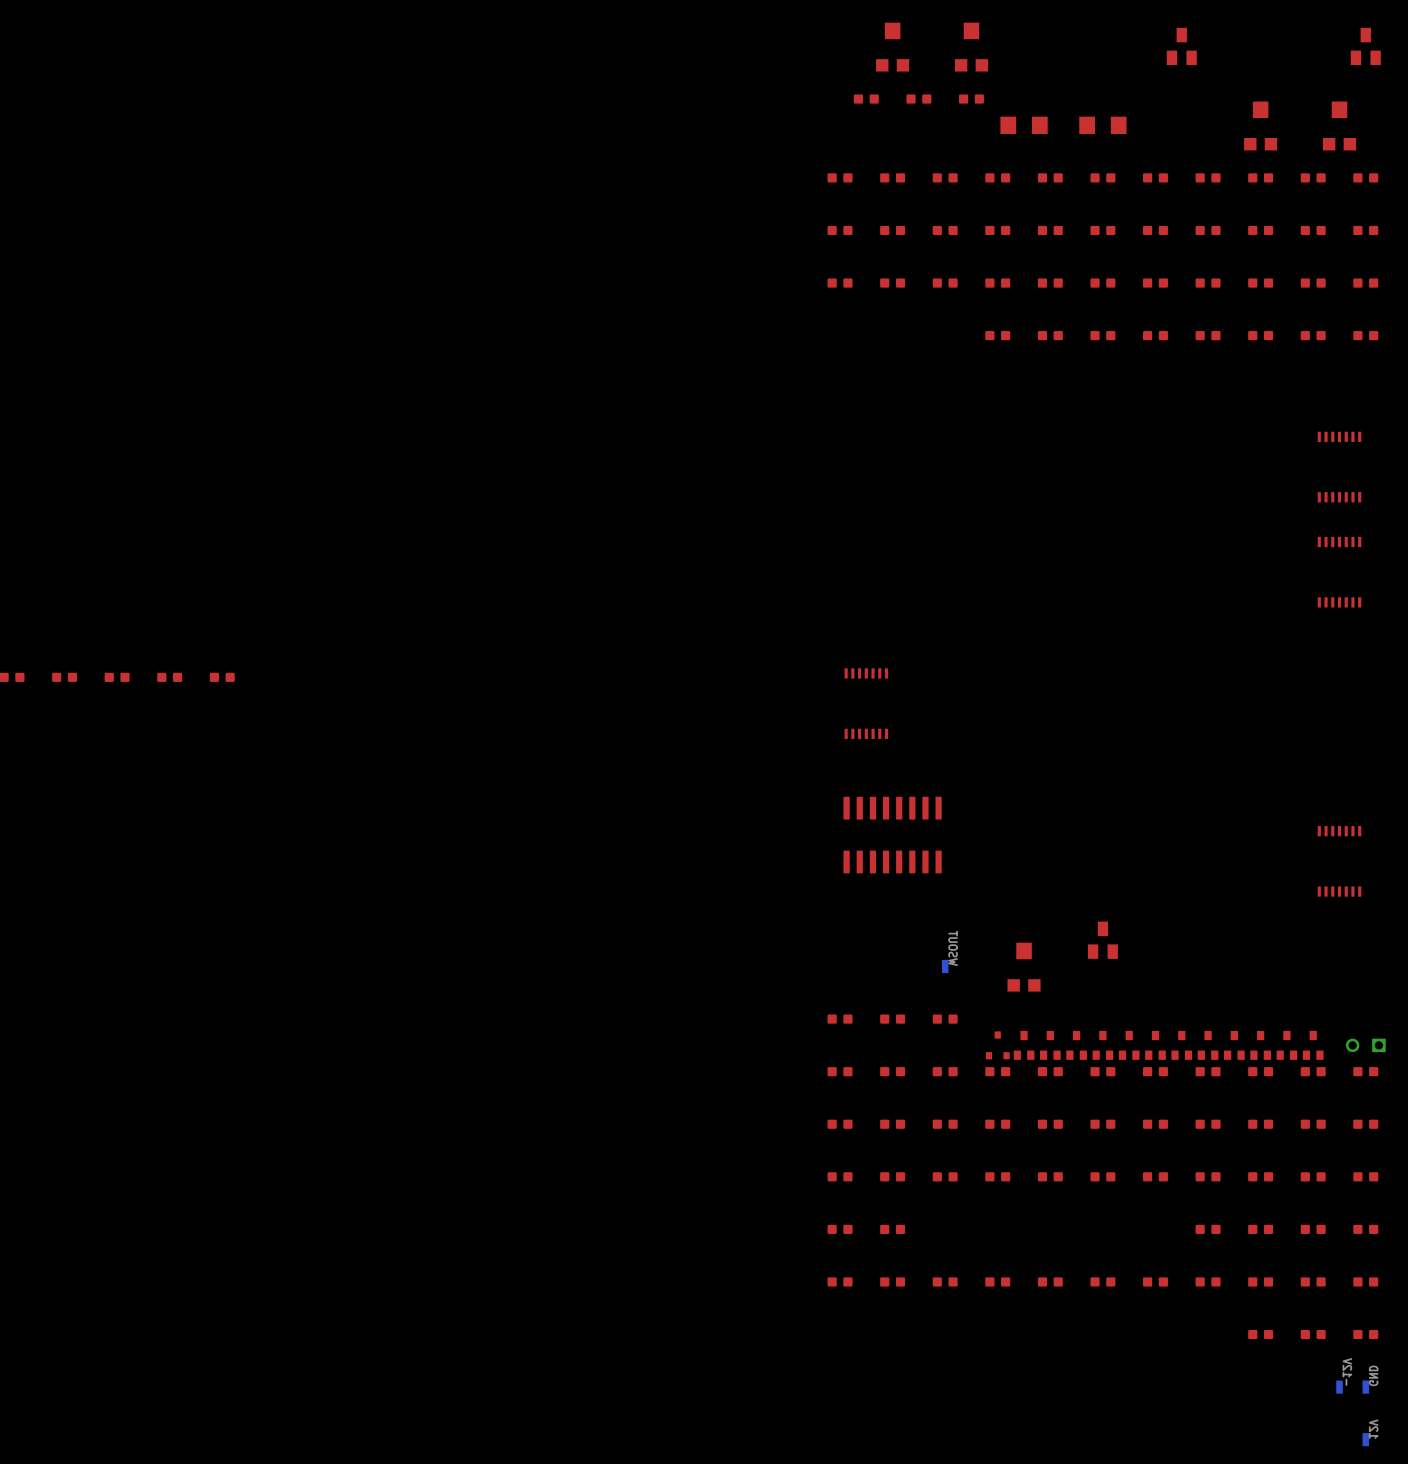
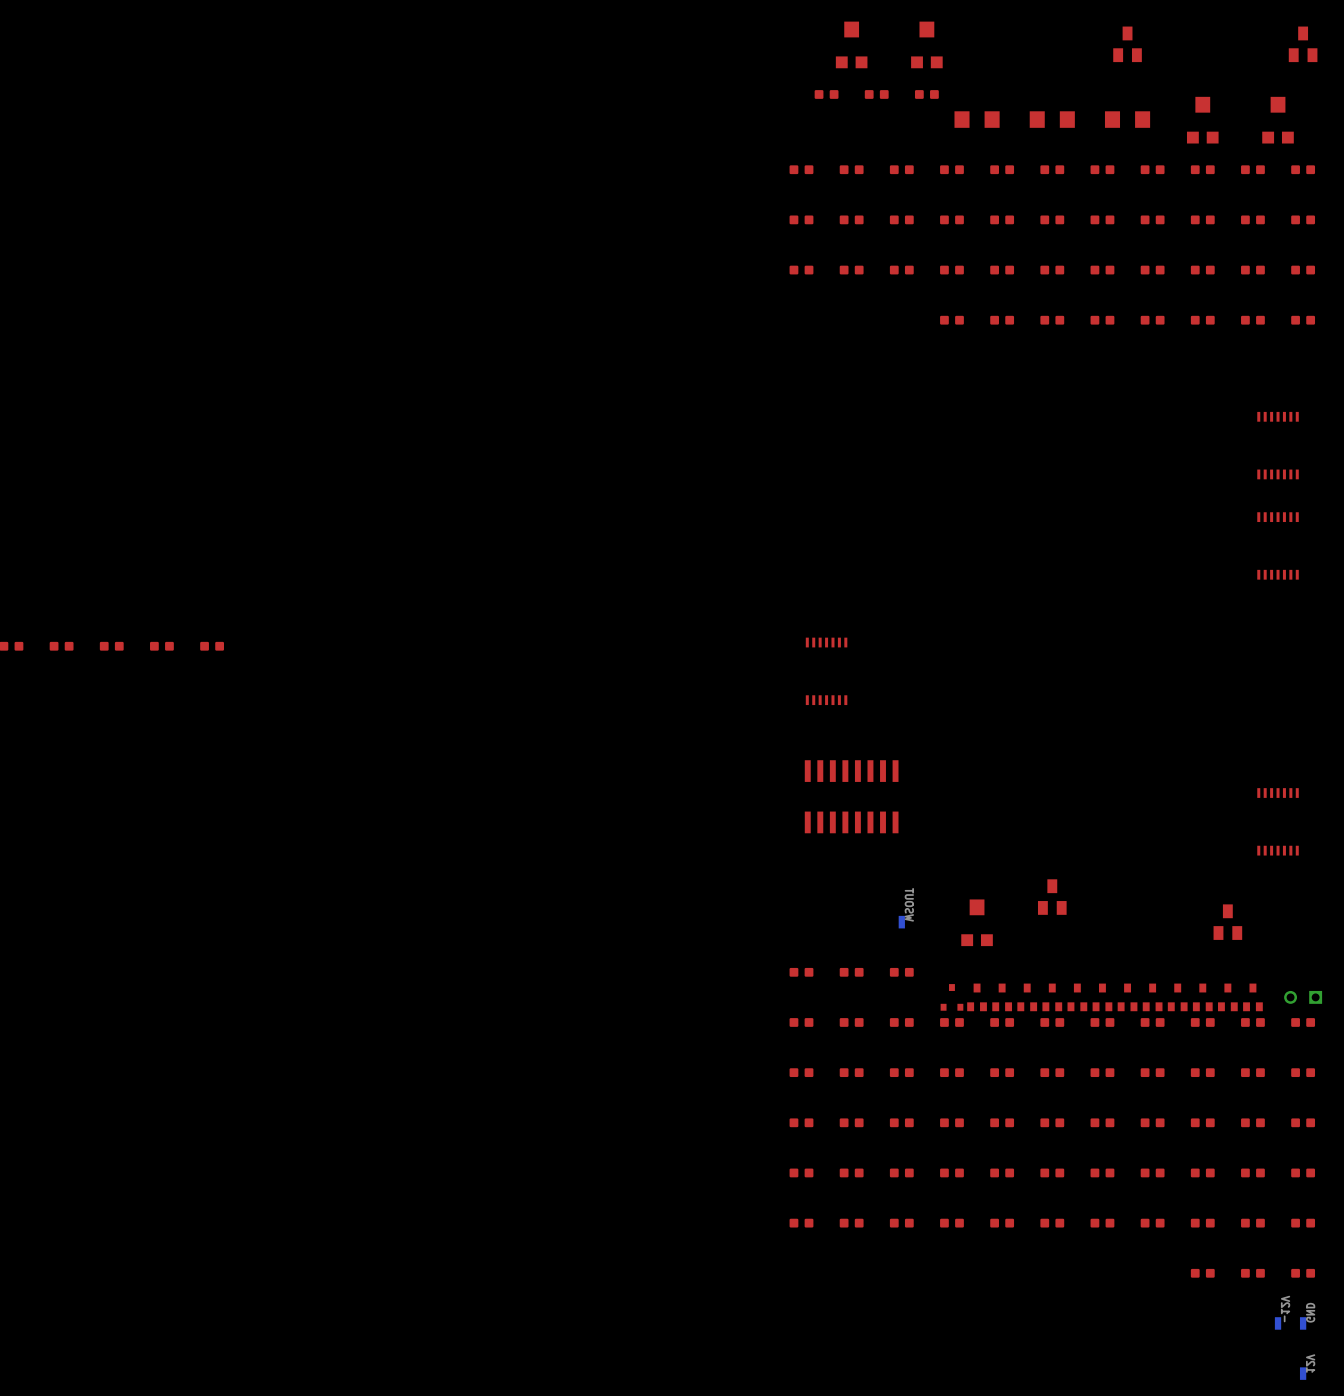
part: none -> (1127, 119)
part: none -> (1227, 922)
part: none -> (901, 1172)
part: none -> (951, 1172)
part: none -> (1002, 1172)
part: none -> (1052, 1172)
part: none -> (1102, 1172)

